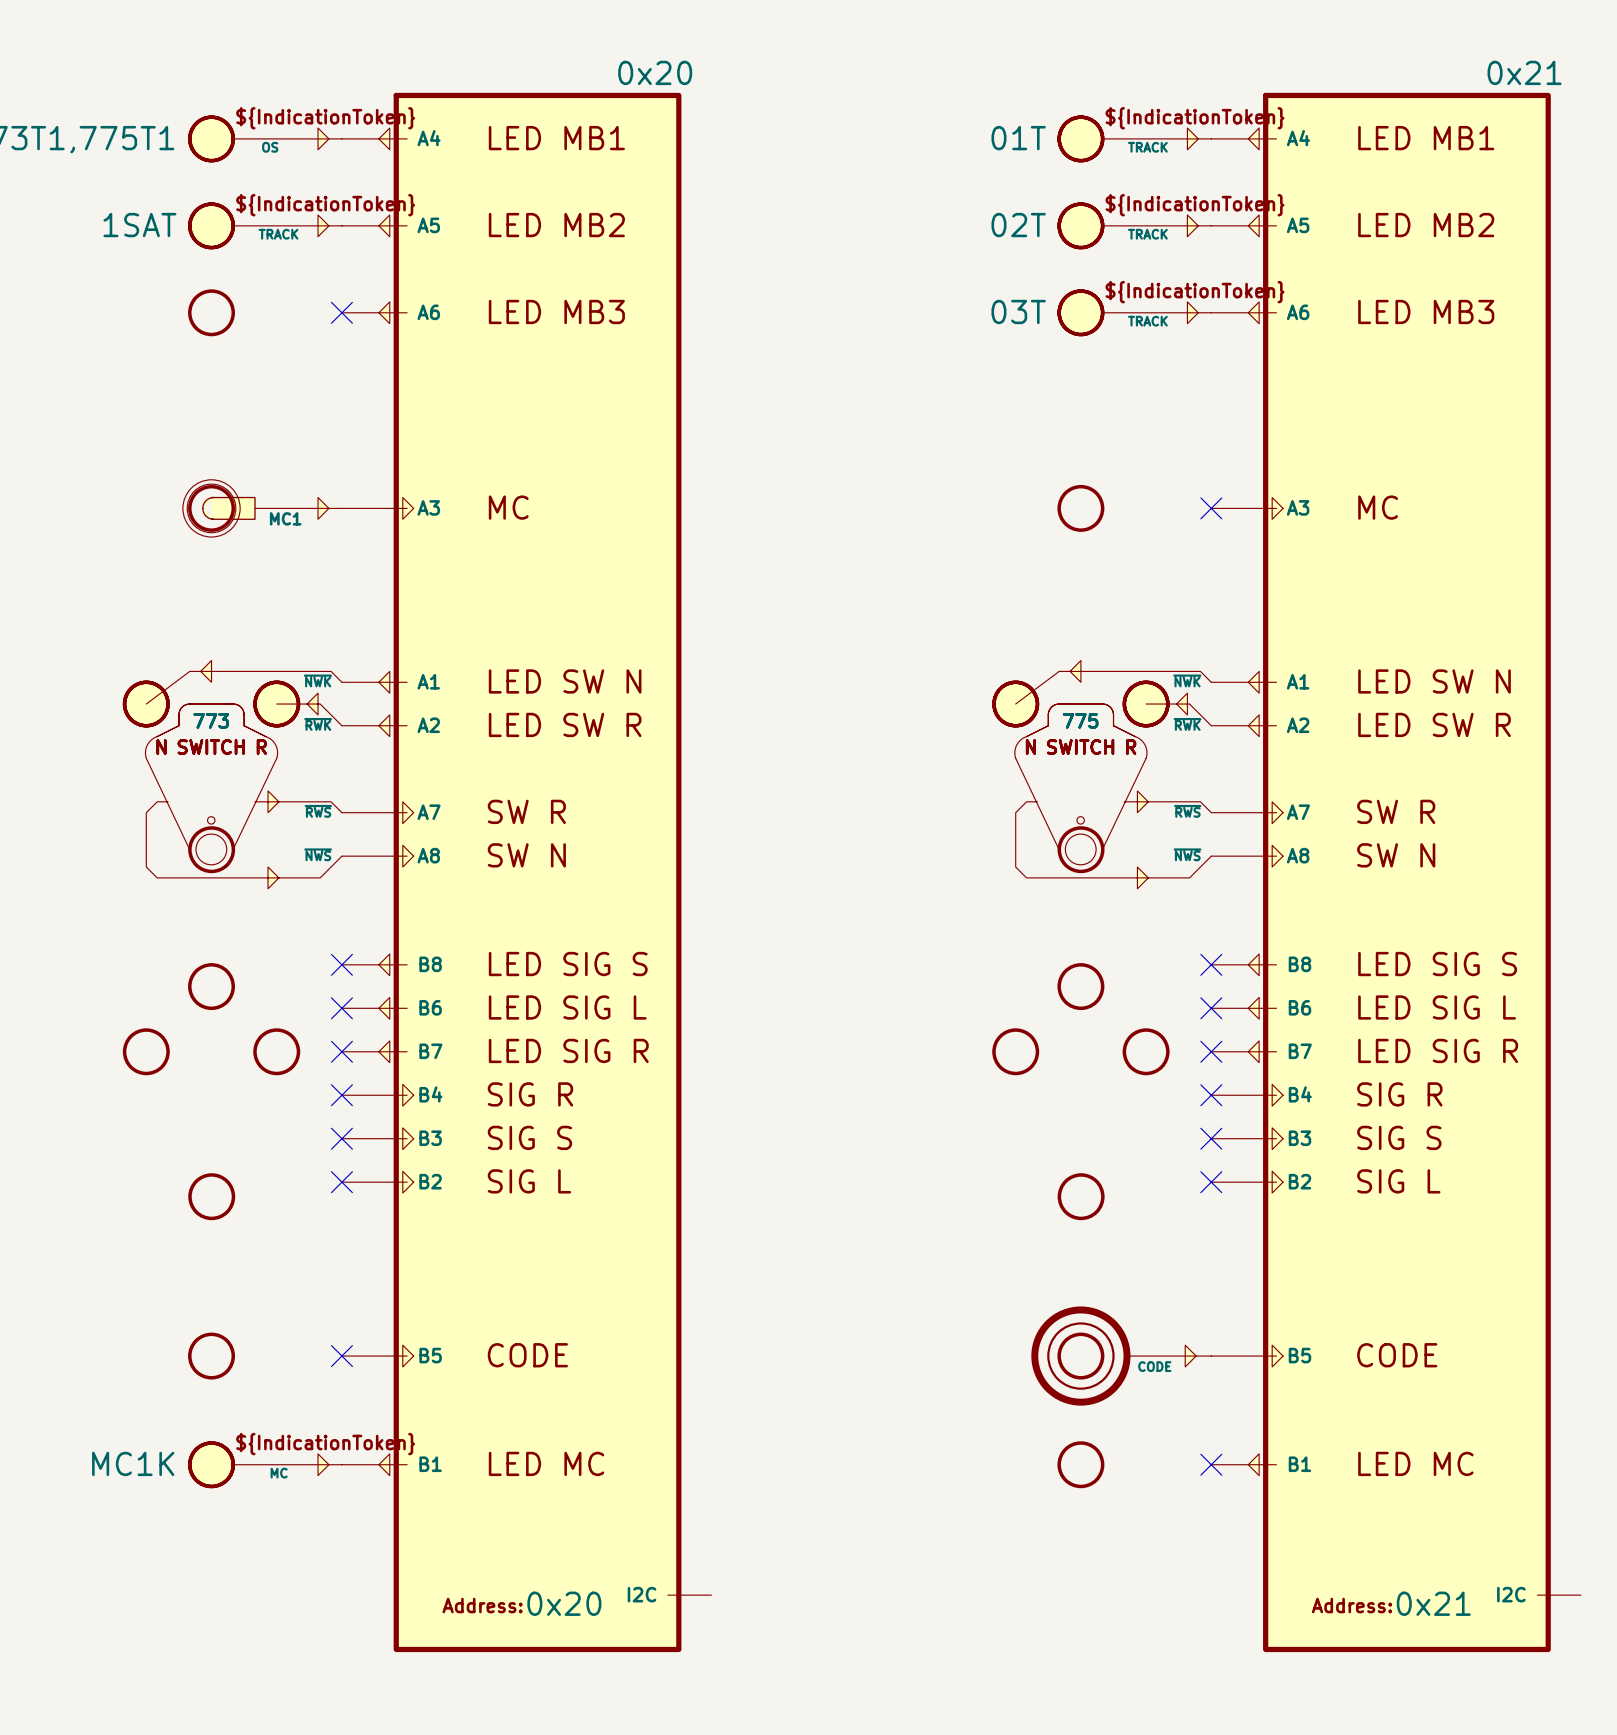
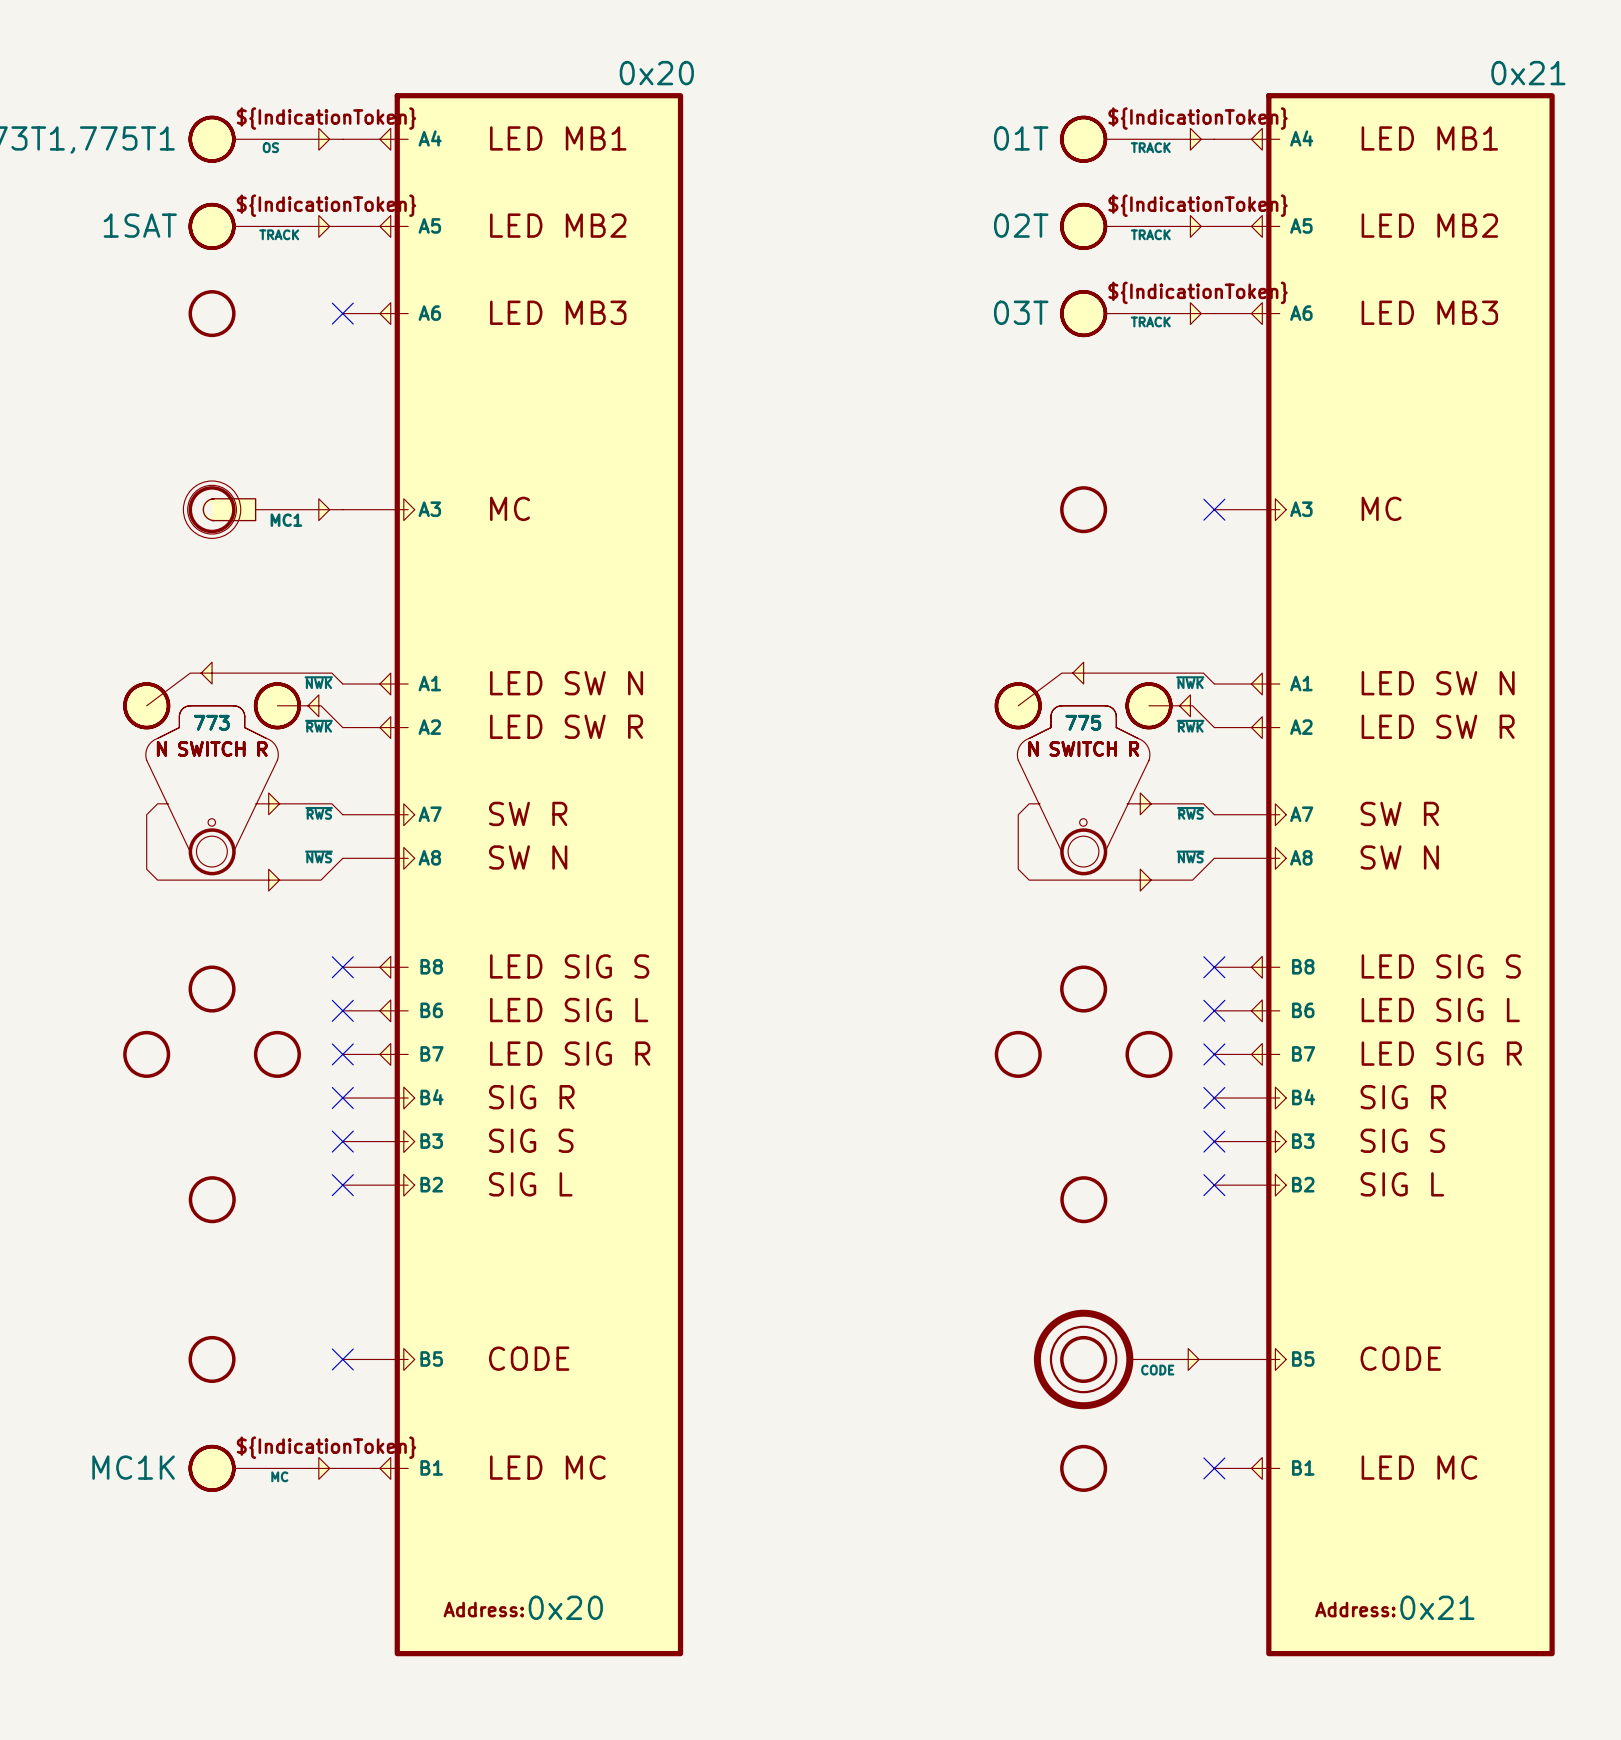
part symbol: [341, 92, 712, 1653] -> [342, 93, 684, 1657]
part symbol: [1211, 92, 1581, 1653] -> [1214, 93, 1555, 1657]

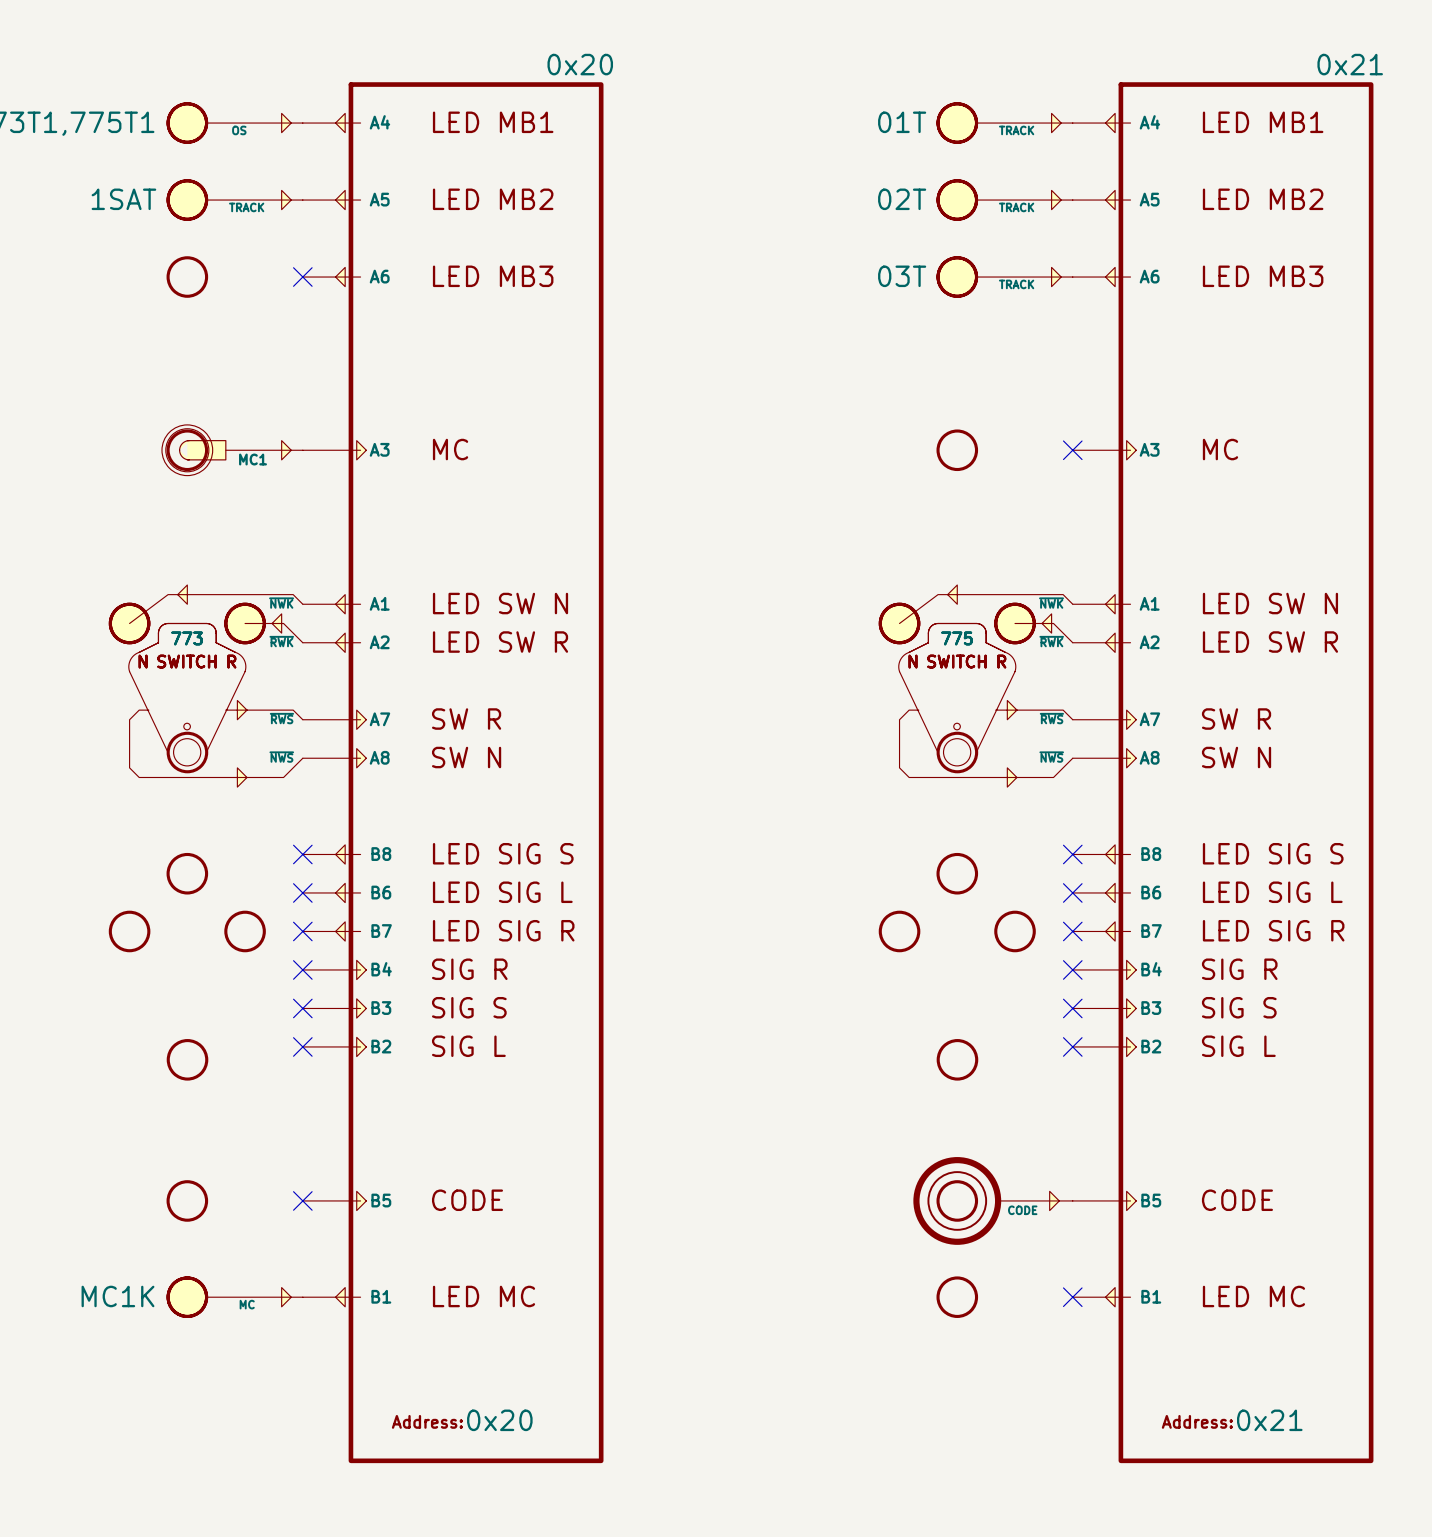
part symbol: [342, 93, 684, 1657] -> [302, 82, 604, 1464]
part symbol: [1214, 93, 1555, 1657] -> [1072, 82, 1374, 1464]
part text: ${IndicationToken} (326, 118) -> none
part text: ${IndicationToken} (1198, 118) -> none
part text: ${IndicationToken} (326, 205) -> none
part text: ${IndicationToken} (1198, 205) -> none
part text: ${IndicationToken} (1198, 292) -> none
part text: ${IndicationToken} (326, 1447) -> none

